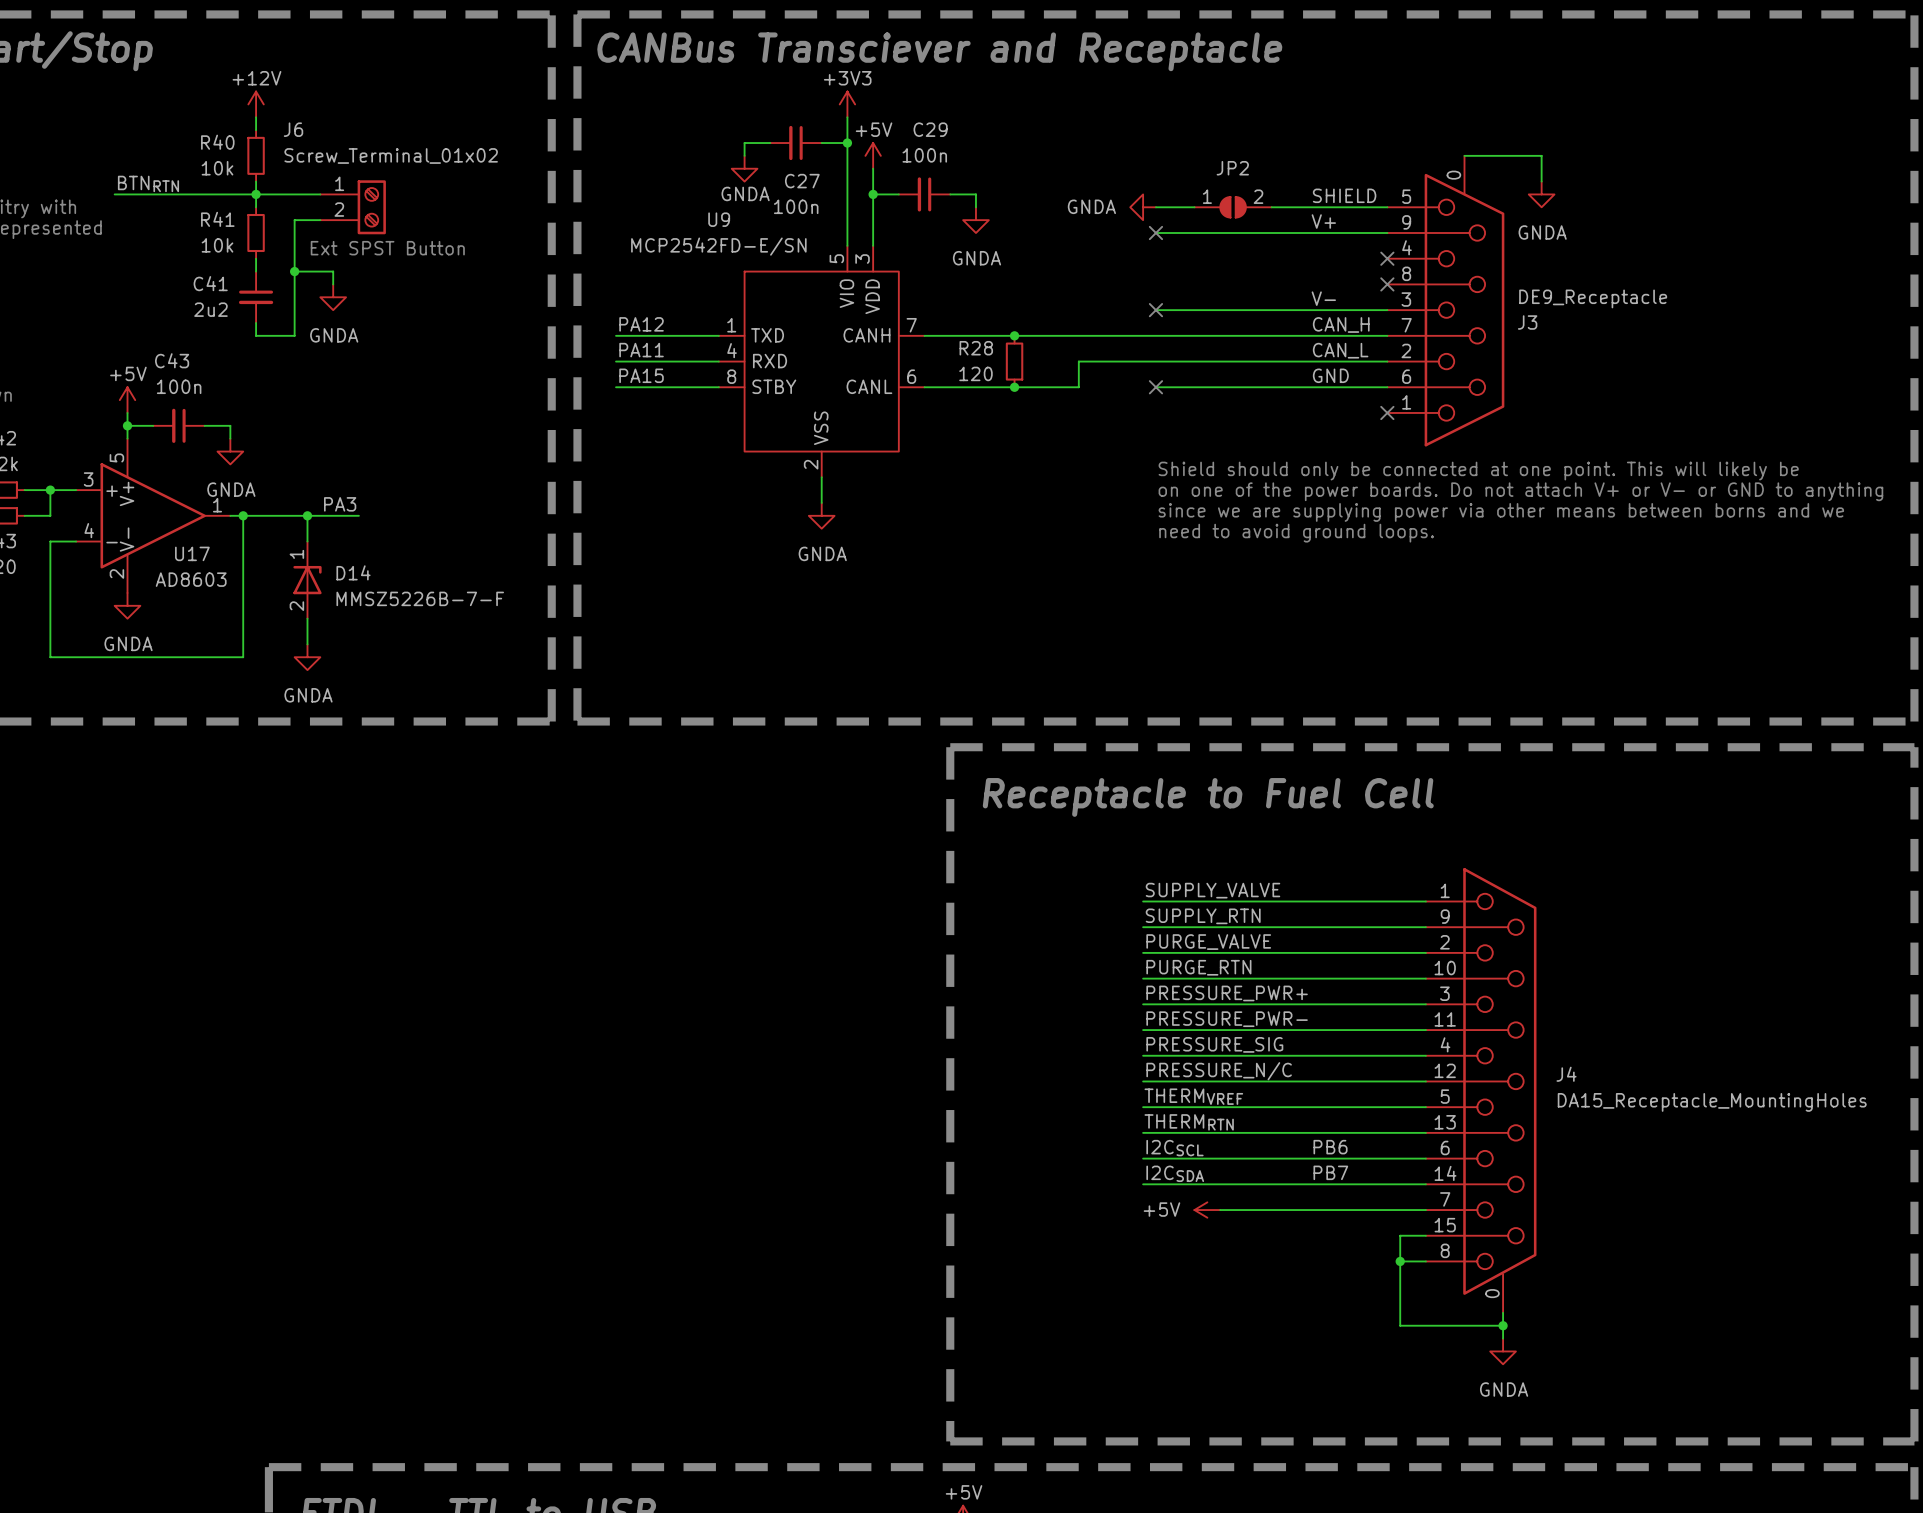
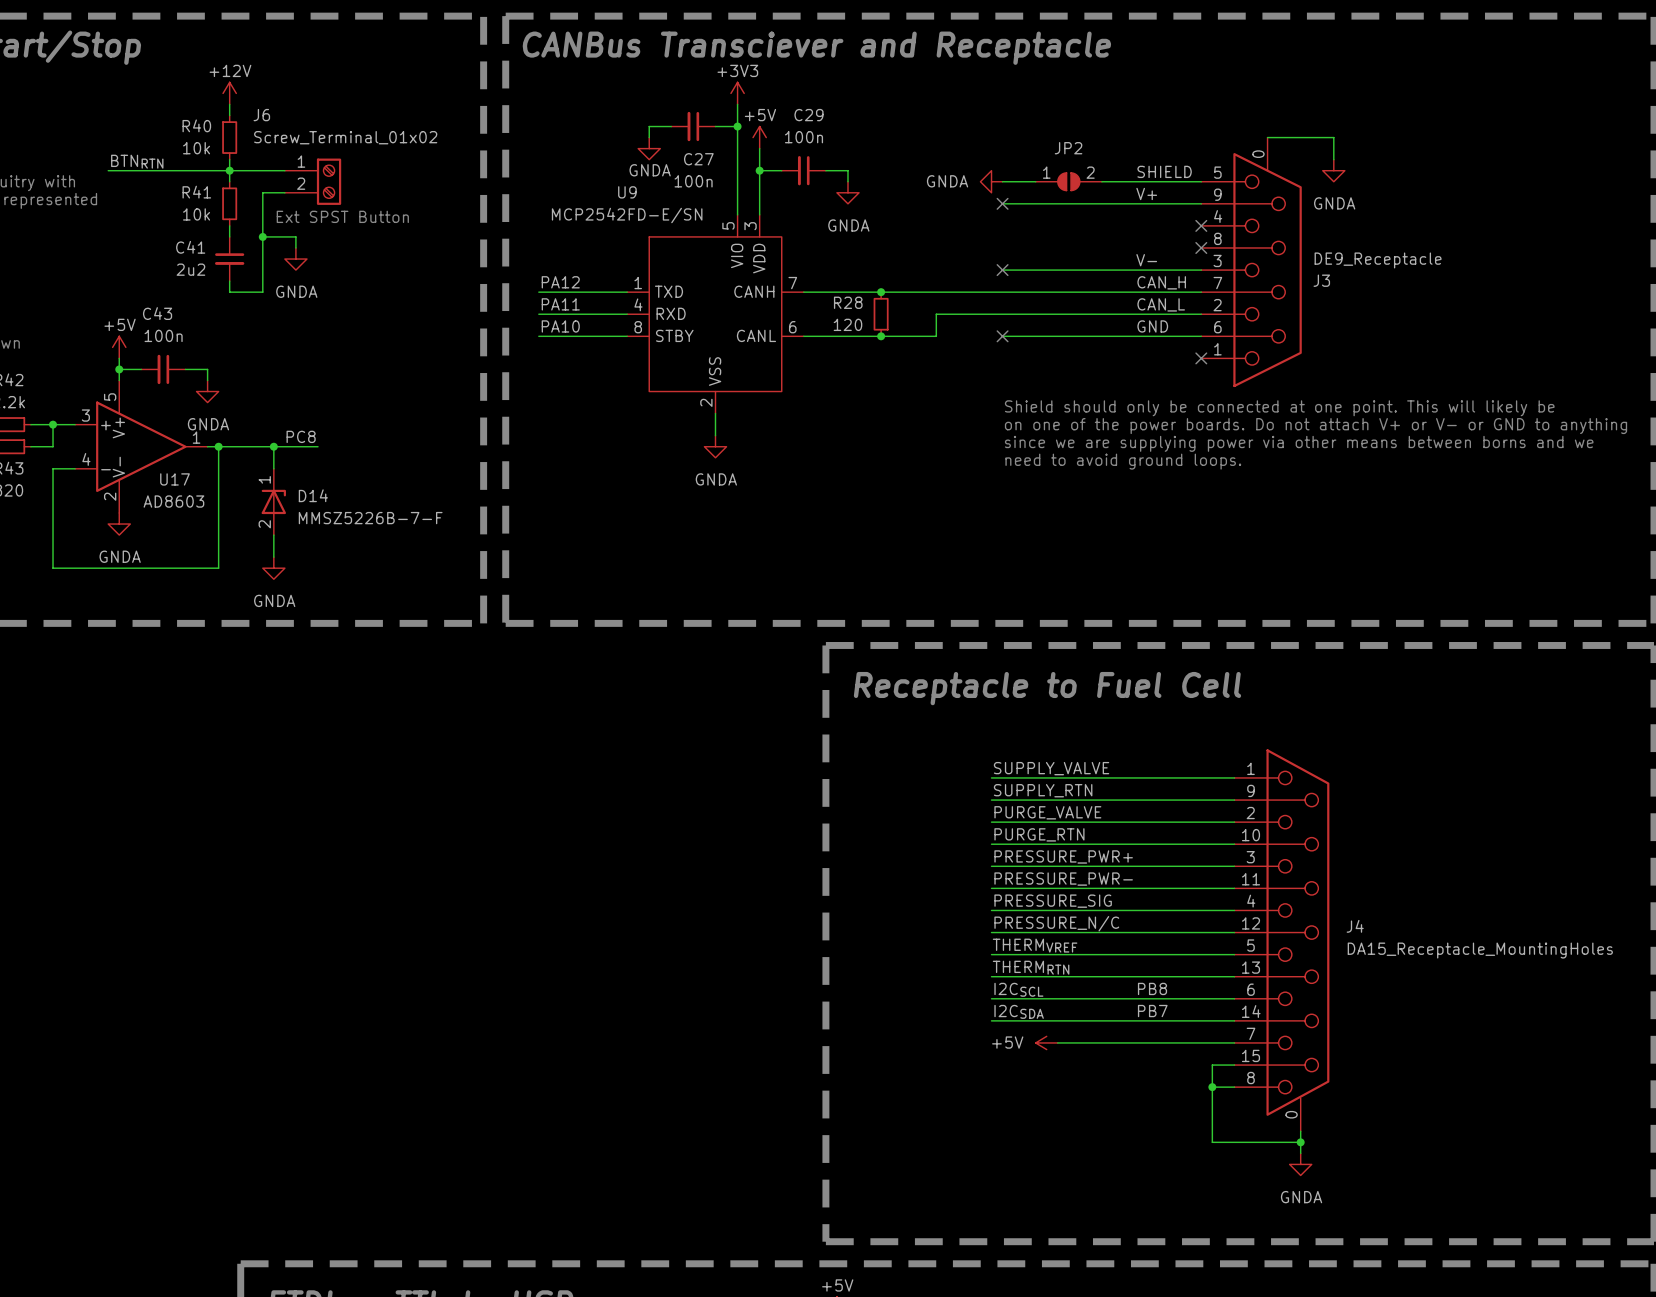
label: PA15 (641, 375) -> PA10 (560, 326)
label: PA3 (340, 504) -> PC8 (301, 436)
label: PB6 (1330, 1147) -> PB8 (1152, 988)

